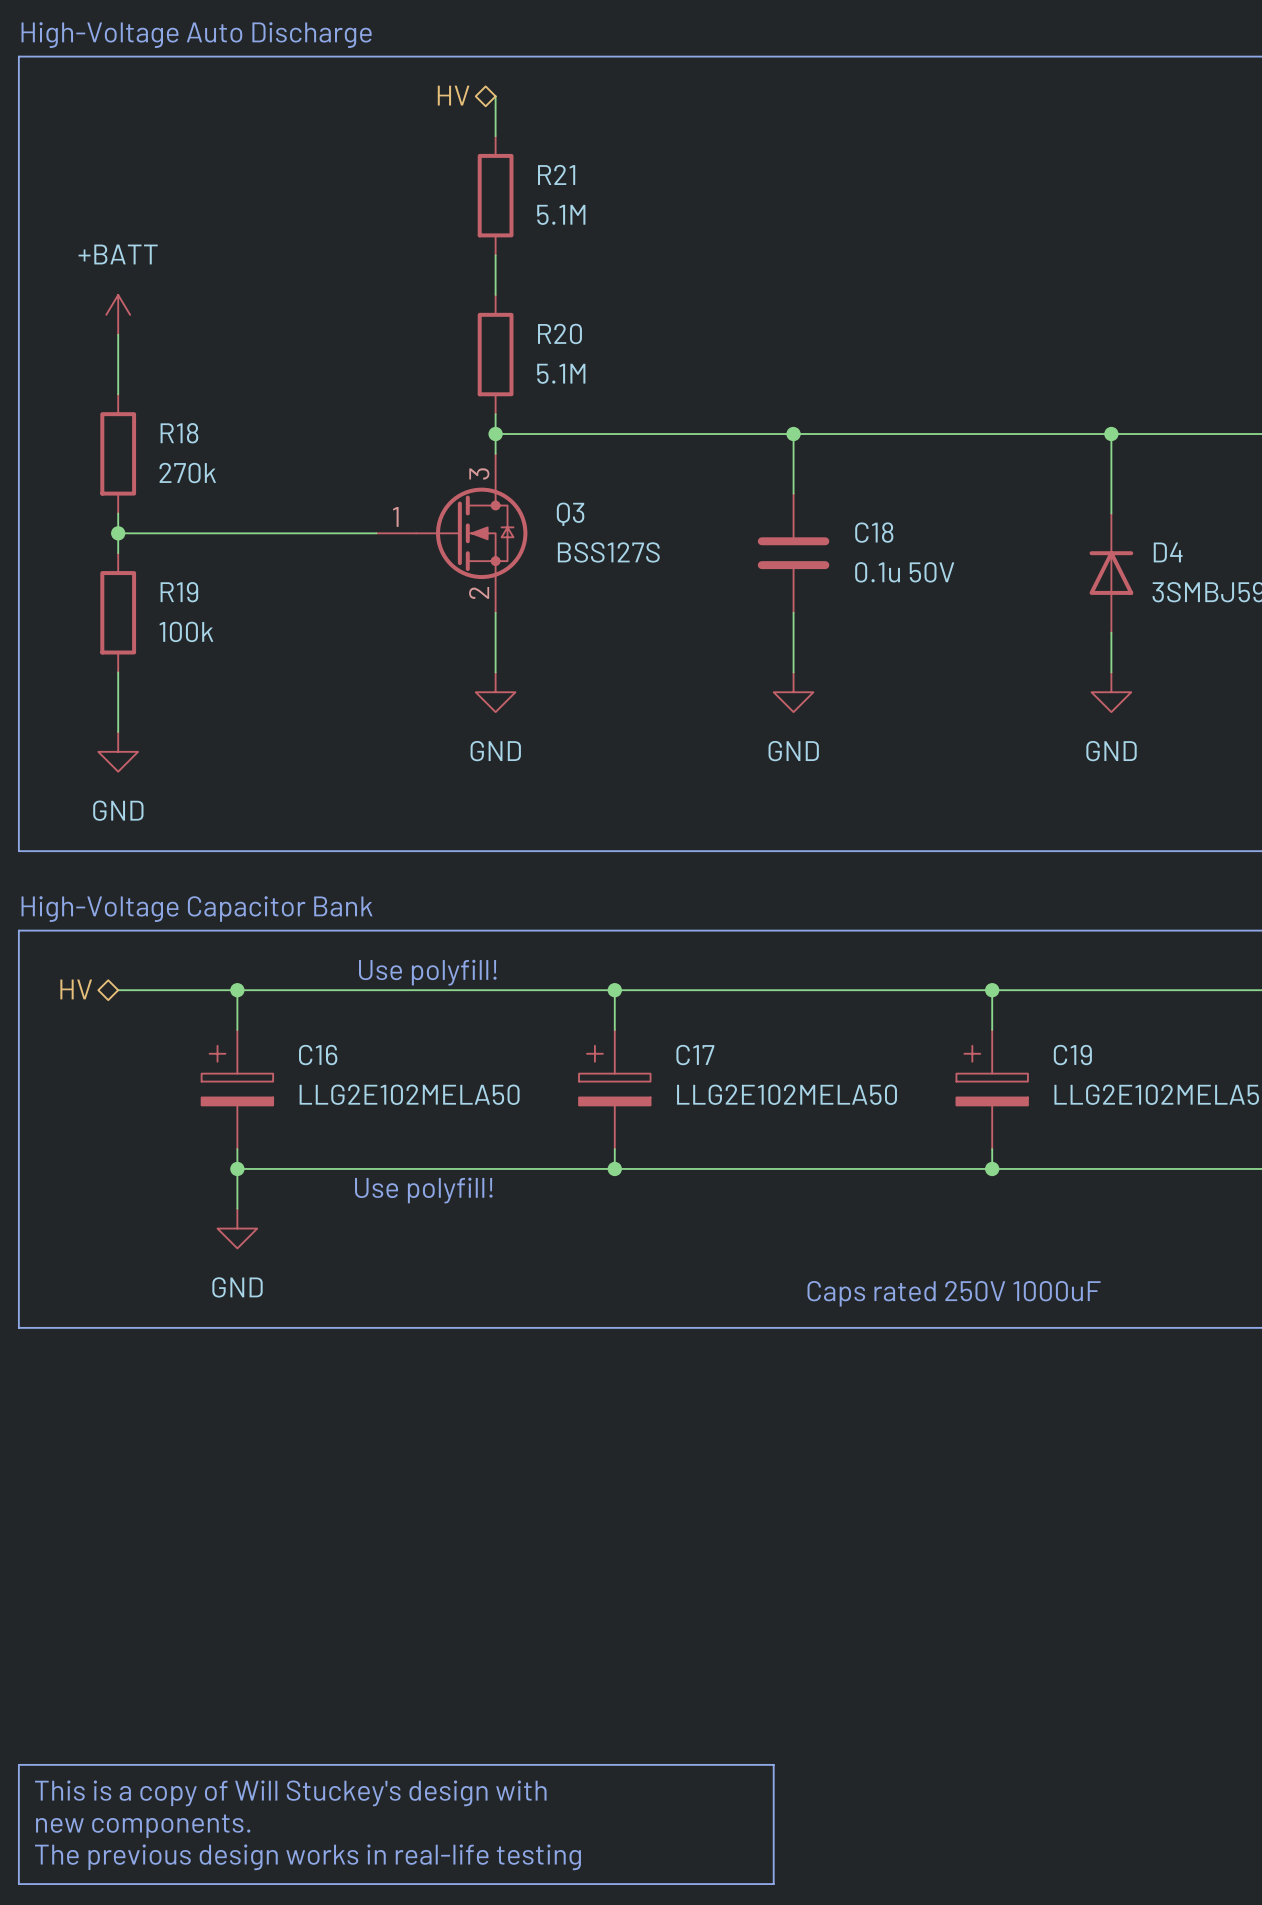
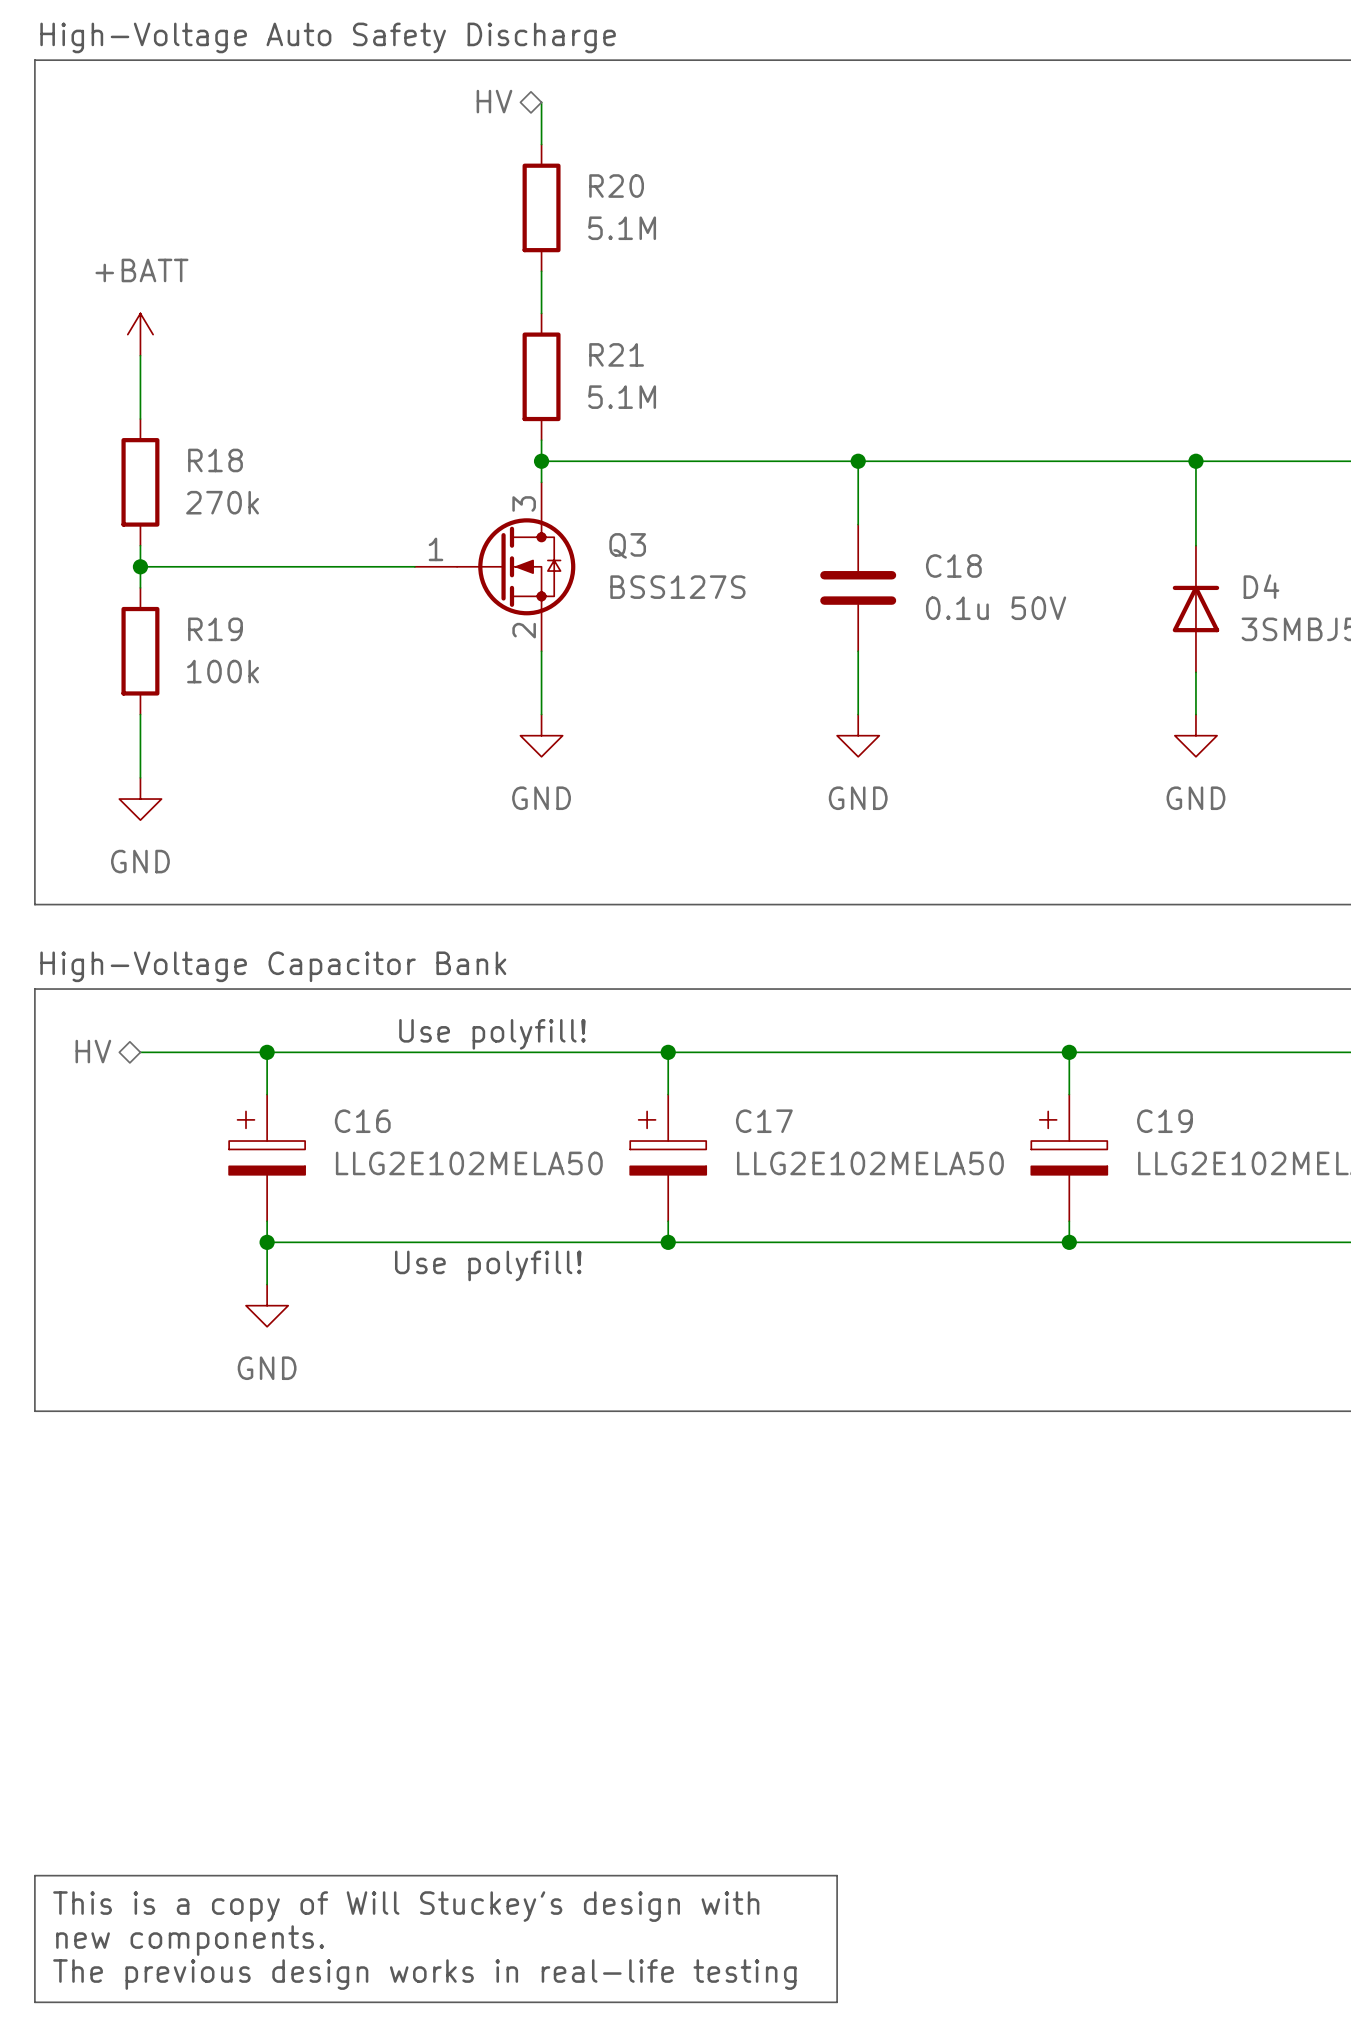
text: High-Voltage Auto Discharge (196, 35) -> High-Voltage Auto Safety Discharge (328, 37)
R21 name: R21 (556, 174) -> R20 (616, 186)
R20 name: R20 (559, 333) -> R21 (616, 354)
text: Caps rated 250V 1000uF (954, 1293) -> none

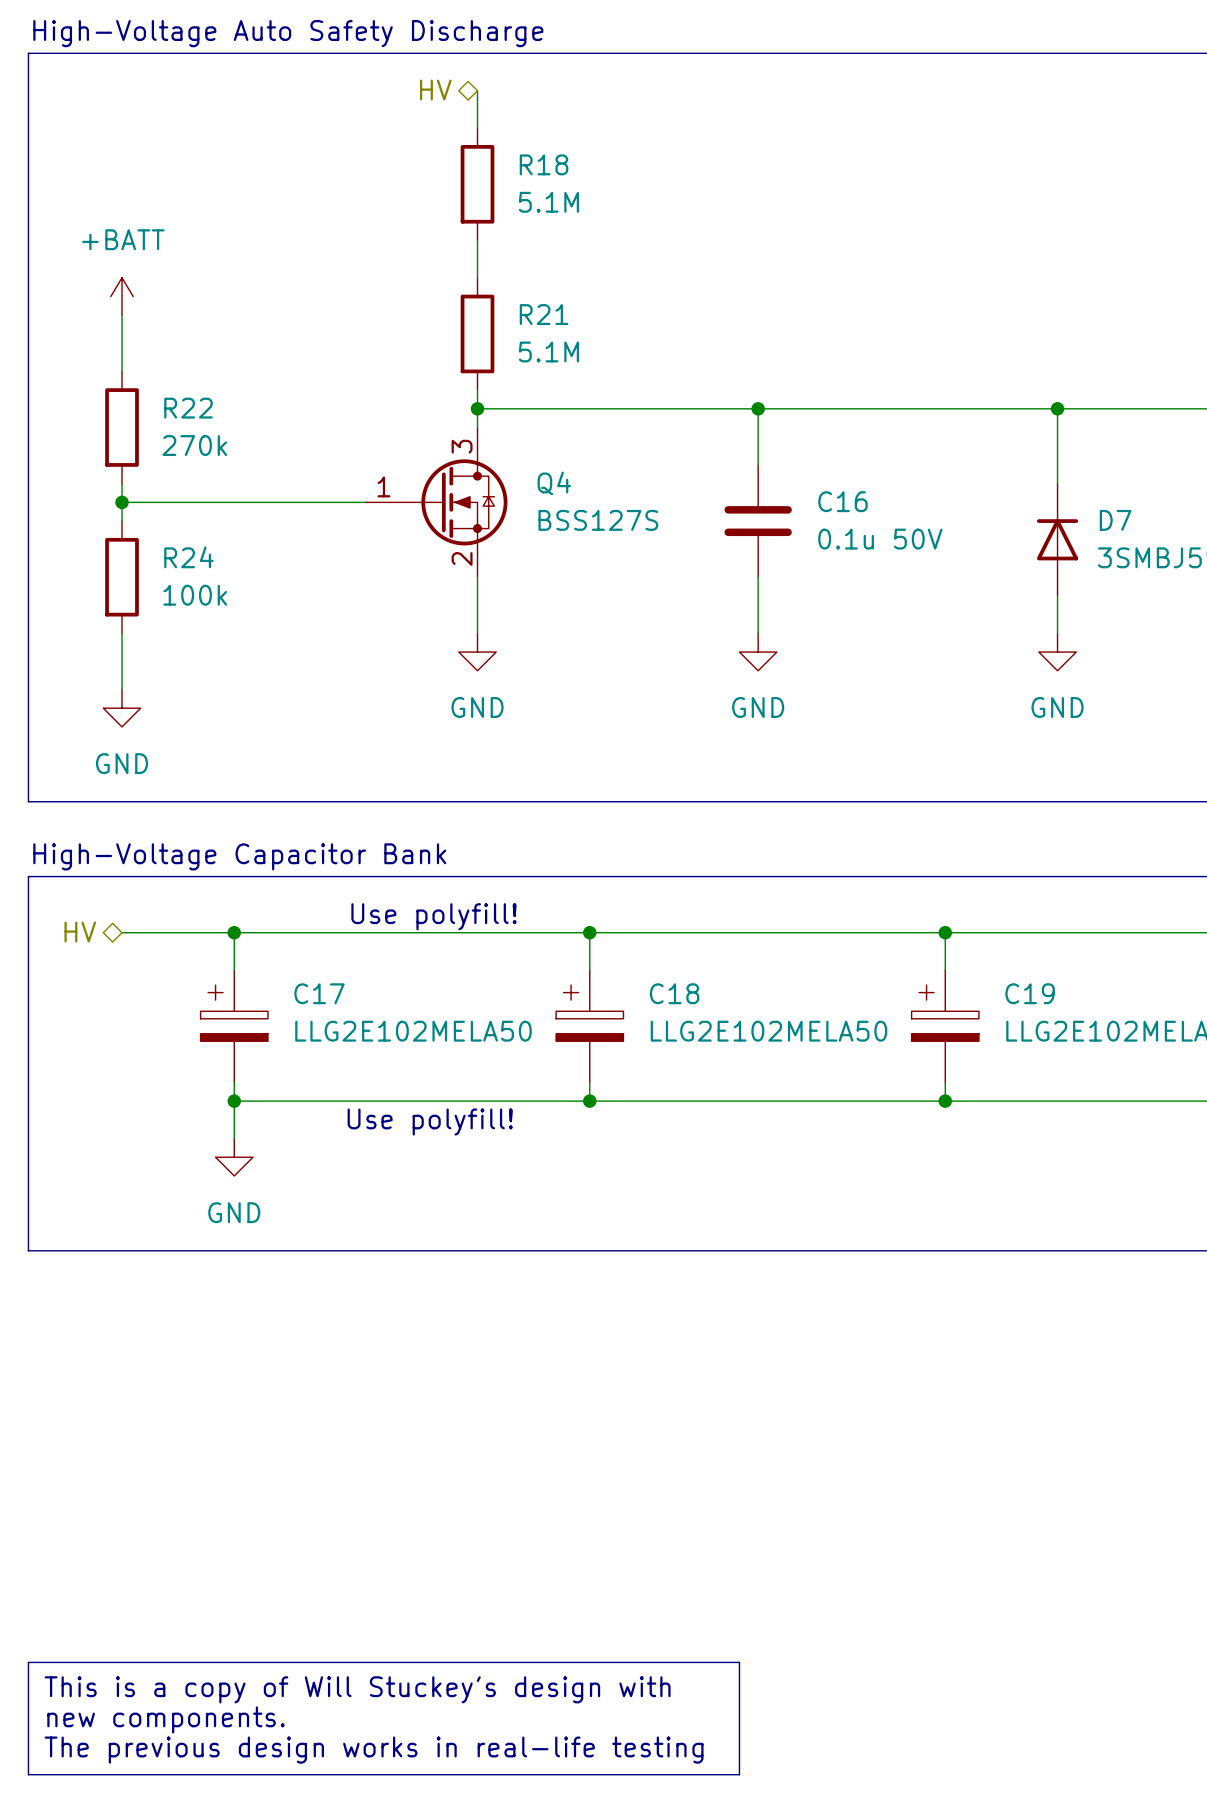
R20 name: R20 (616, 186) -> R18 (544, 164)
R18 name: R18 (215, 460) -> R22 (188, 408)
Q3 name: Q3 (627, 545) -> Q4 (554, 483)
C18 name: C18 (953, 566) -> C16 (842, 501)
D4 name: D4 (1261, 586) -> D7 (1115, 520)
R19 name: R19 (215, 629) -> R24 (188, 557)
C16 name: C16 (362, 1121) -> C17 (319, 993)
C17 name: C17 (764, 1121) -> C18 (674, 993)

